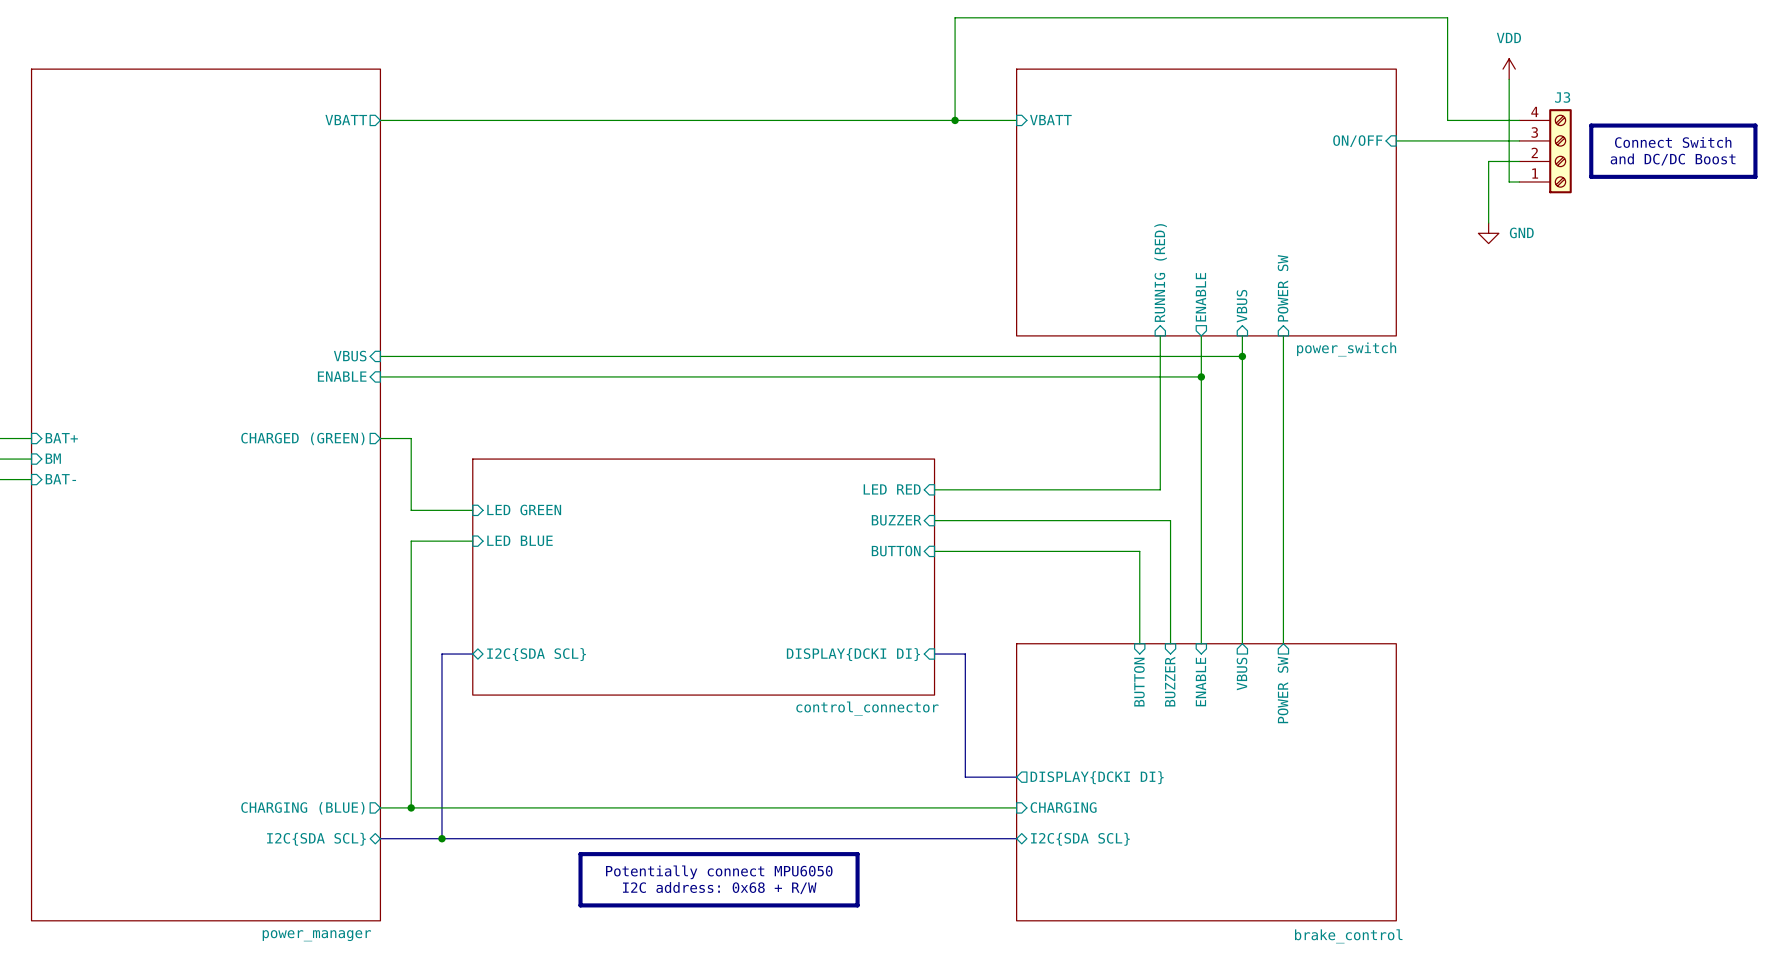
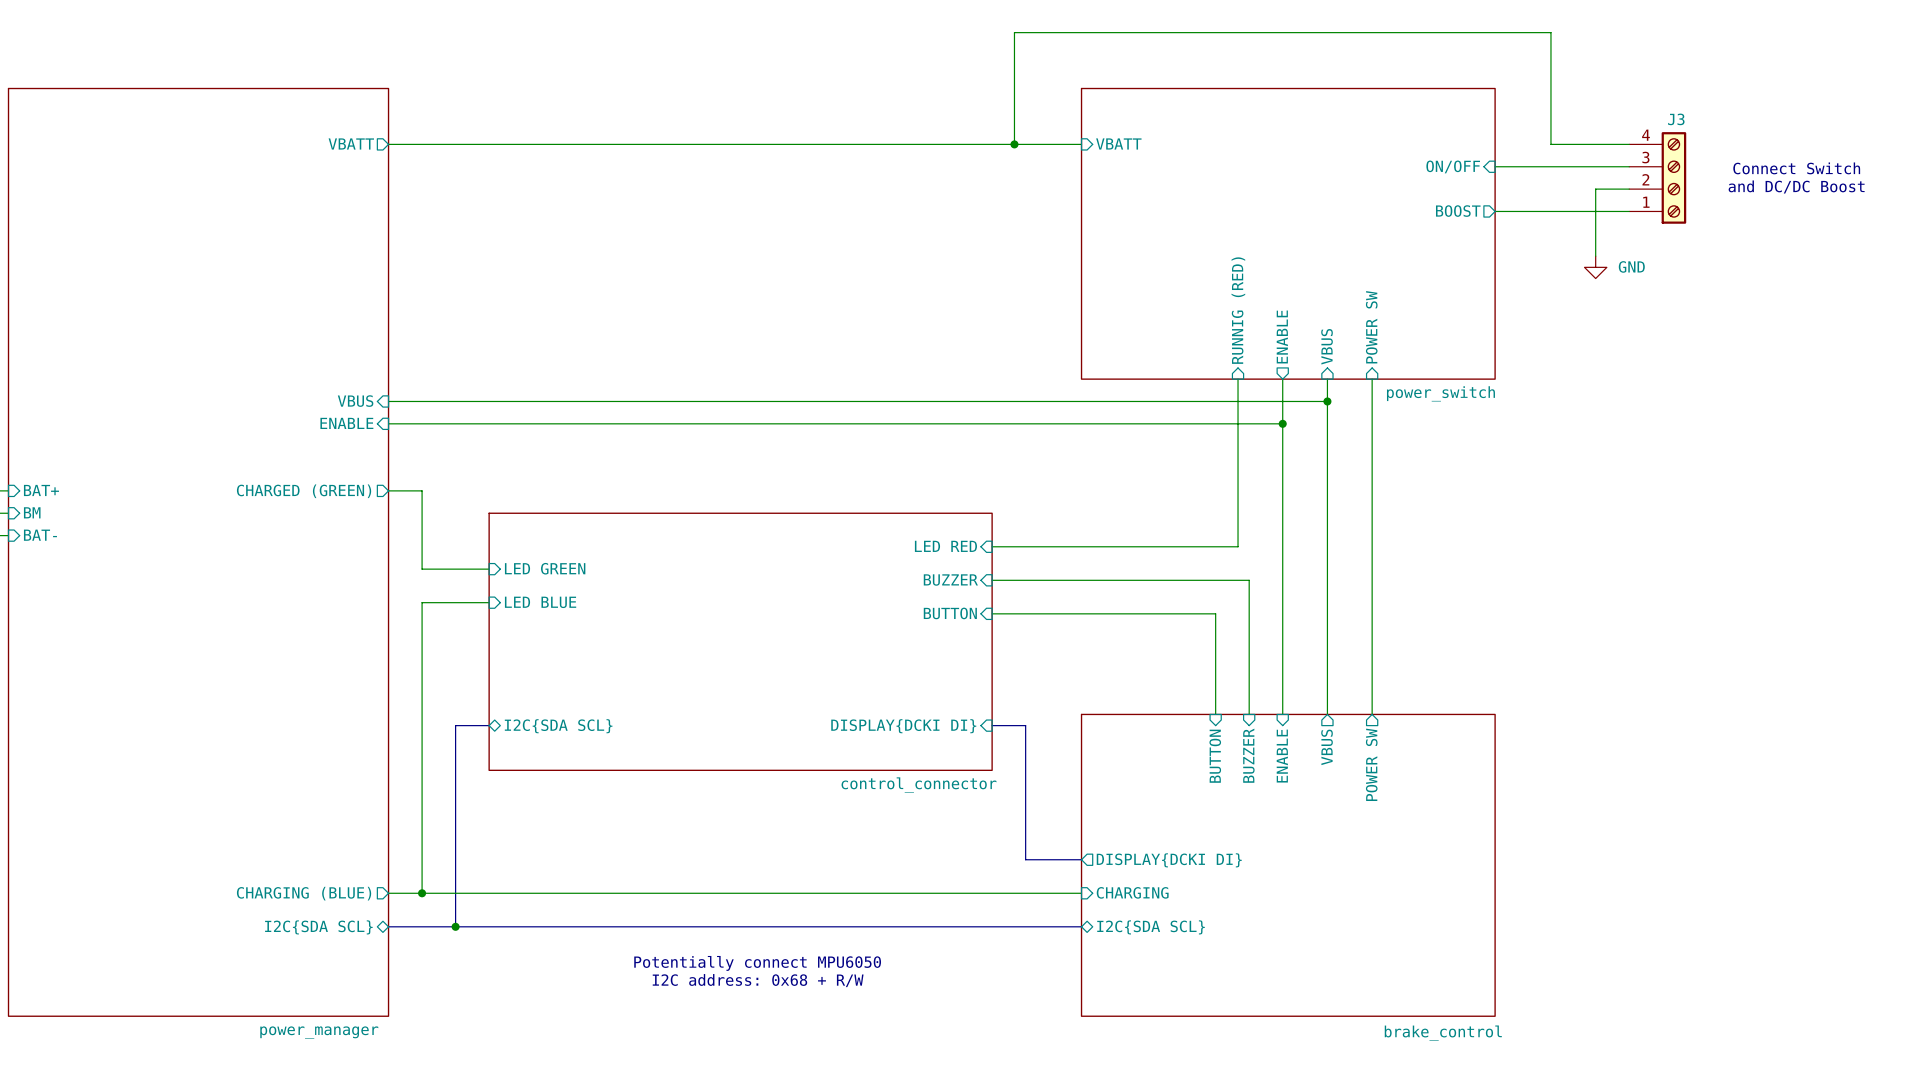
power symbol: VDD (1509, 69) -> none
wire: (1509, 79) (1509, 181) -> (1495, 211) (1618, 211)
line: (1591, 125) (1755, 125) (1755, 176) (1591, 176) (1591, 125) -> none
sheet pin: none -> BOOST (1458, 211)
line: (580, 854) (857, 854) (857, 905) (580, 905) (580, 854) -> none

